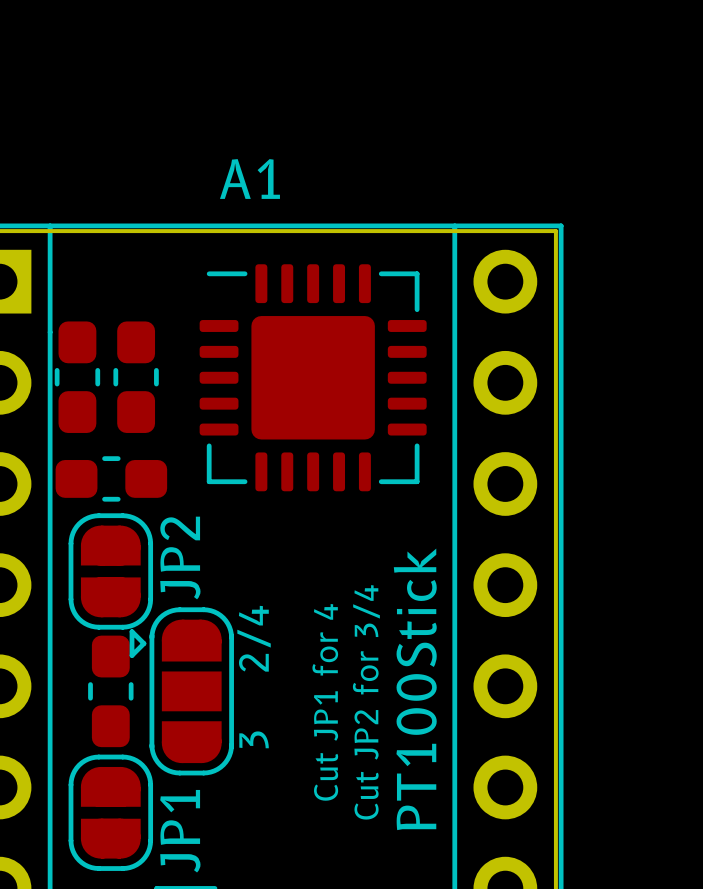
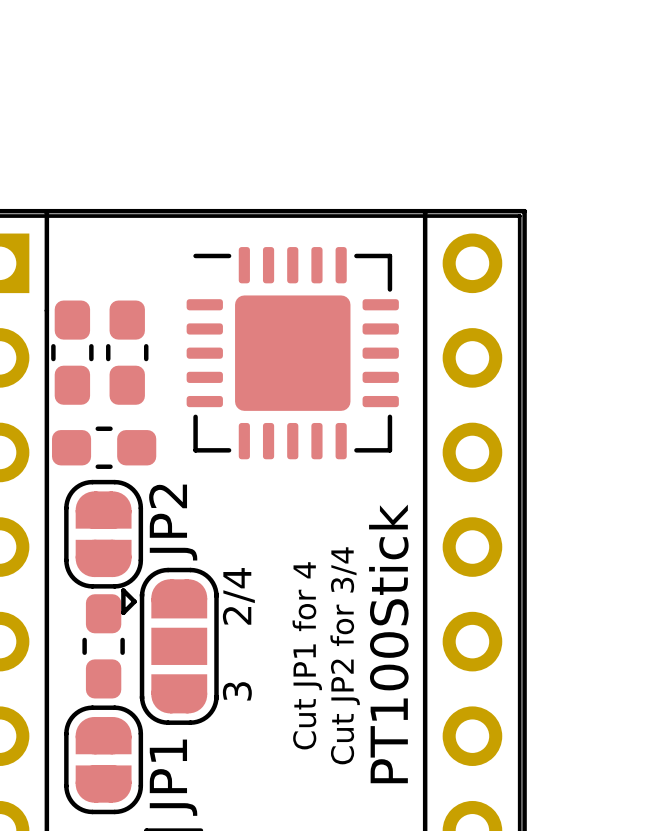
A1 name: A1 (249, 179) -> none

